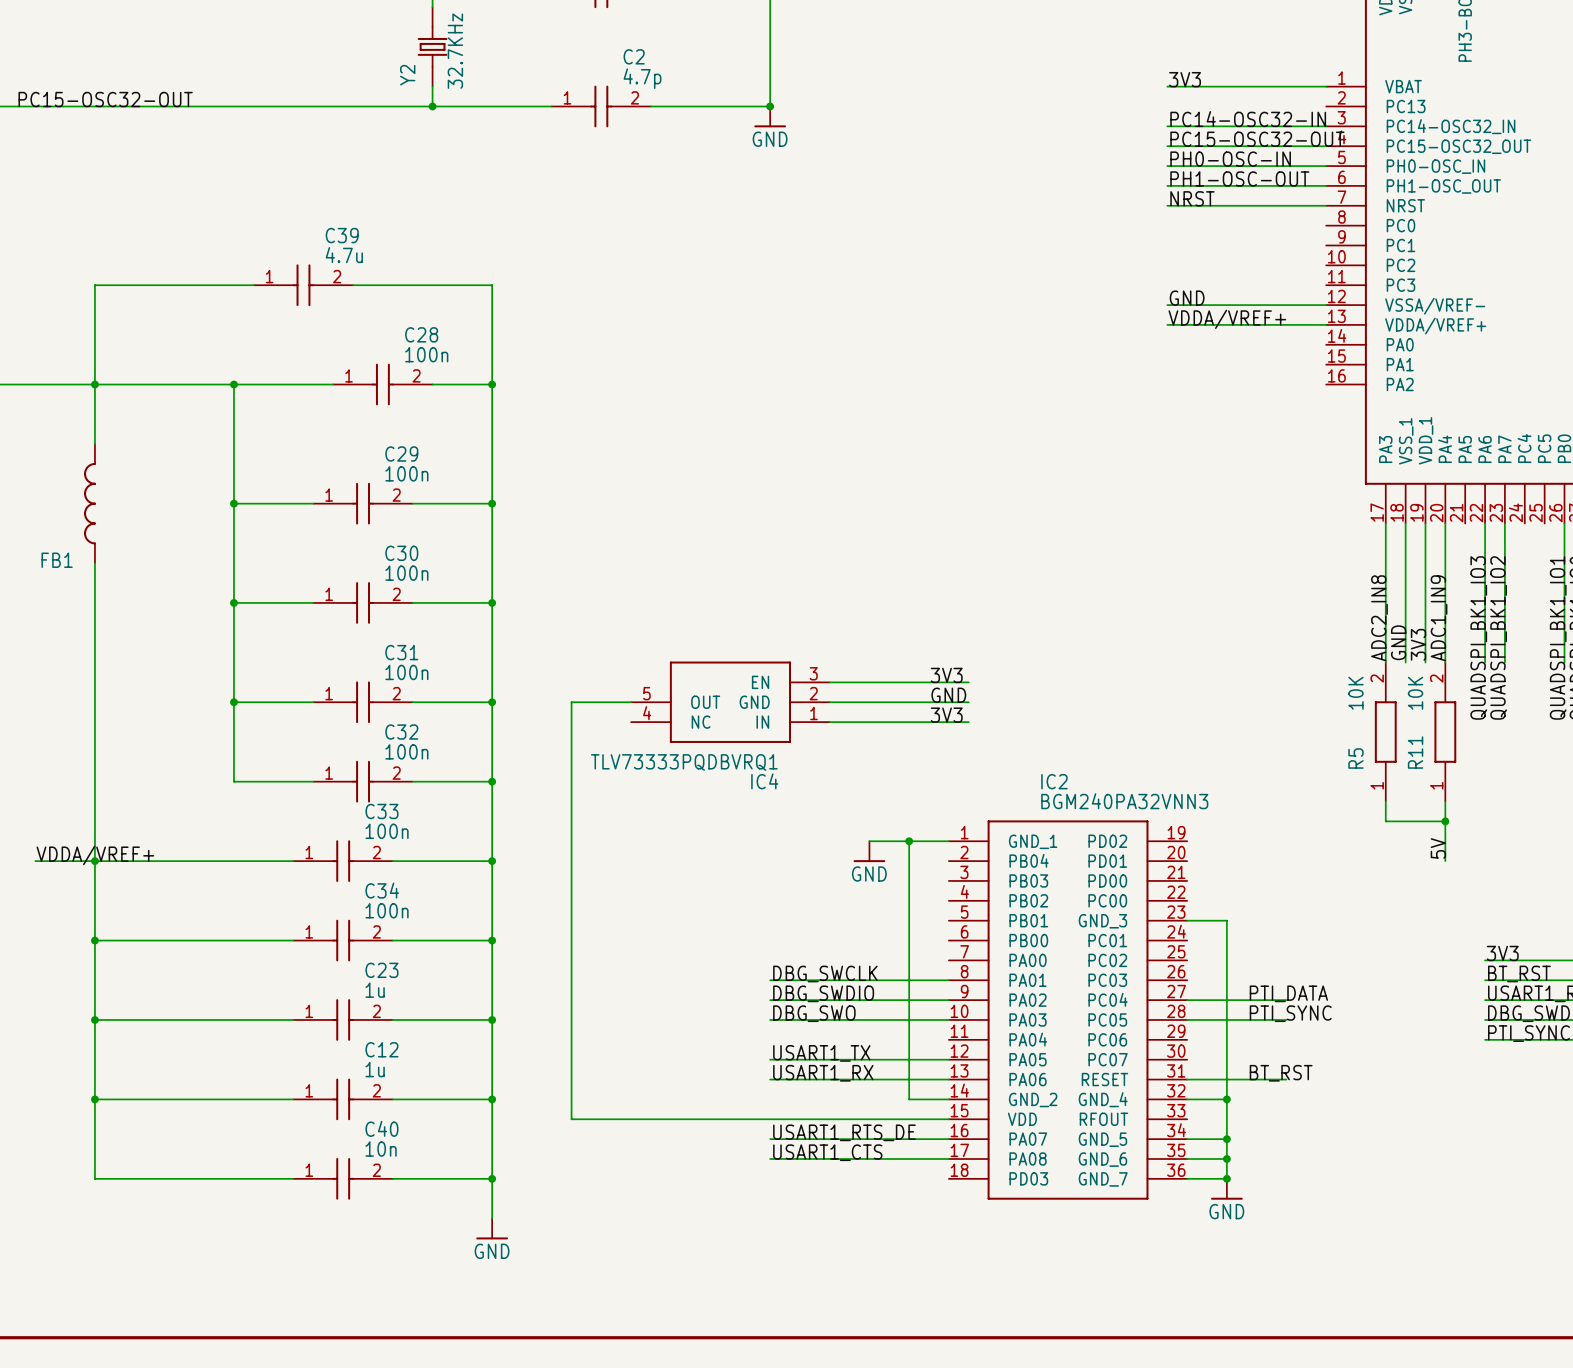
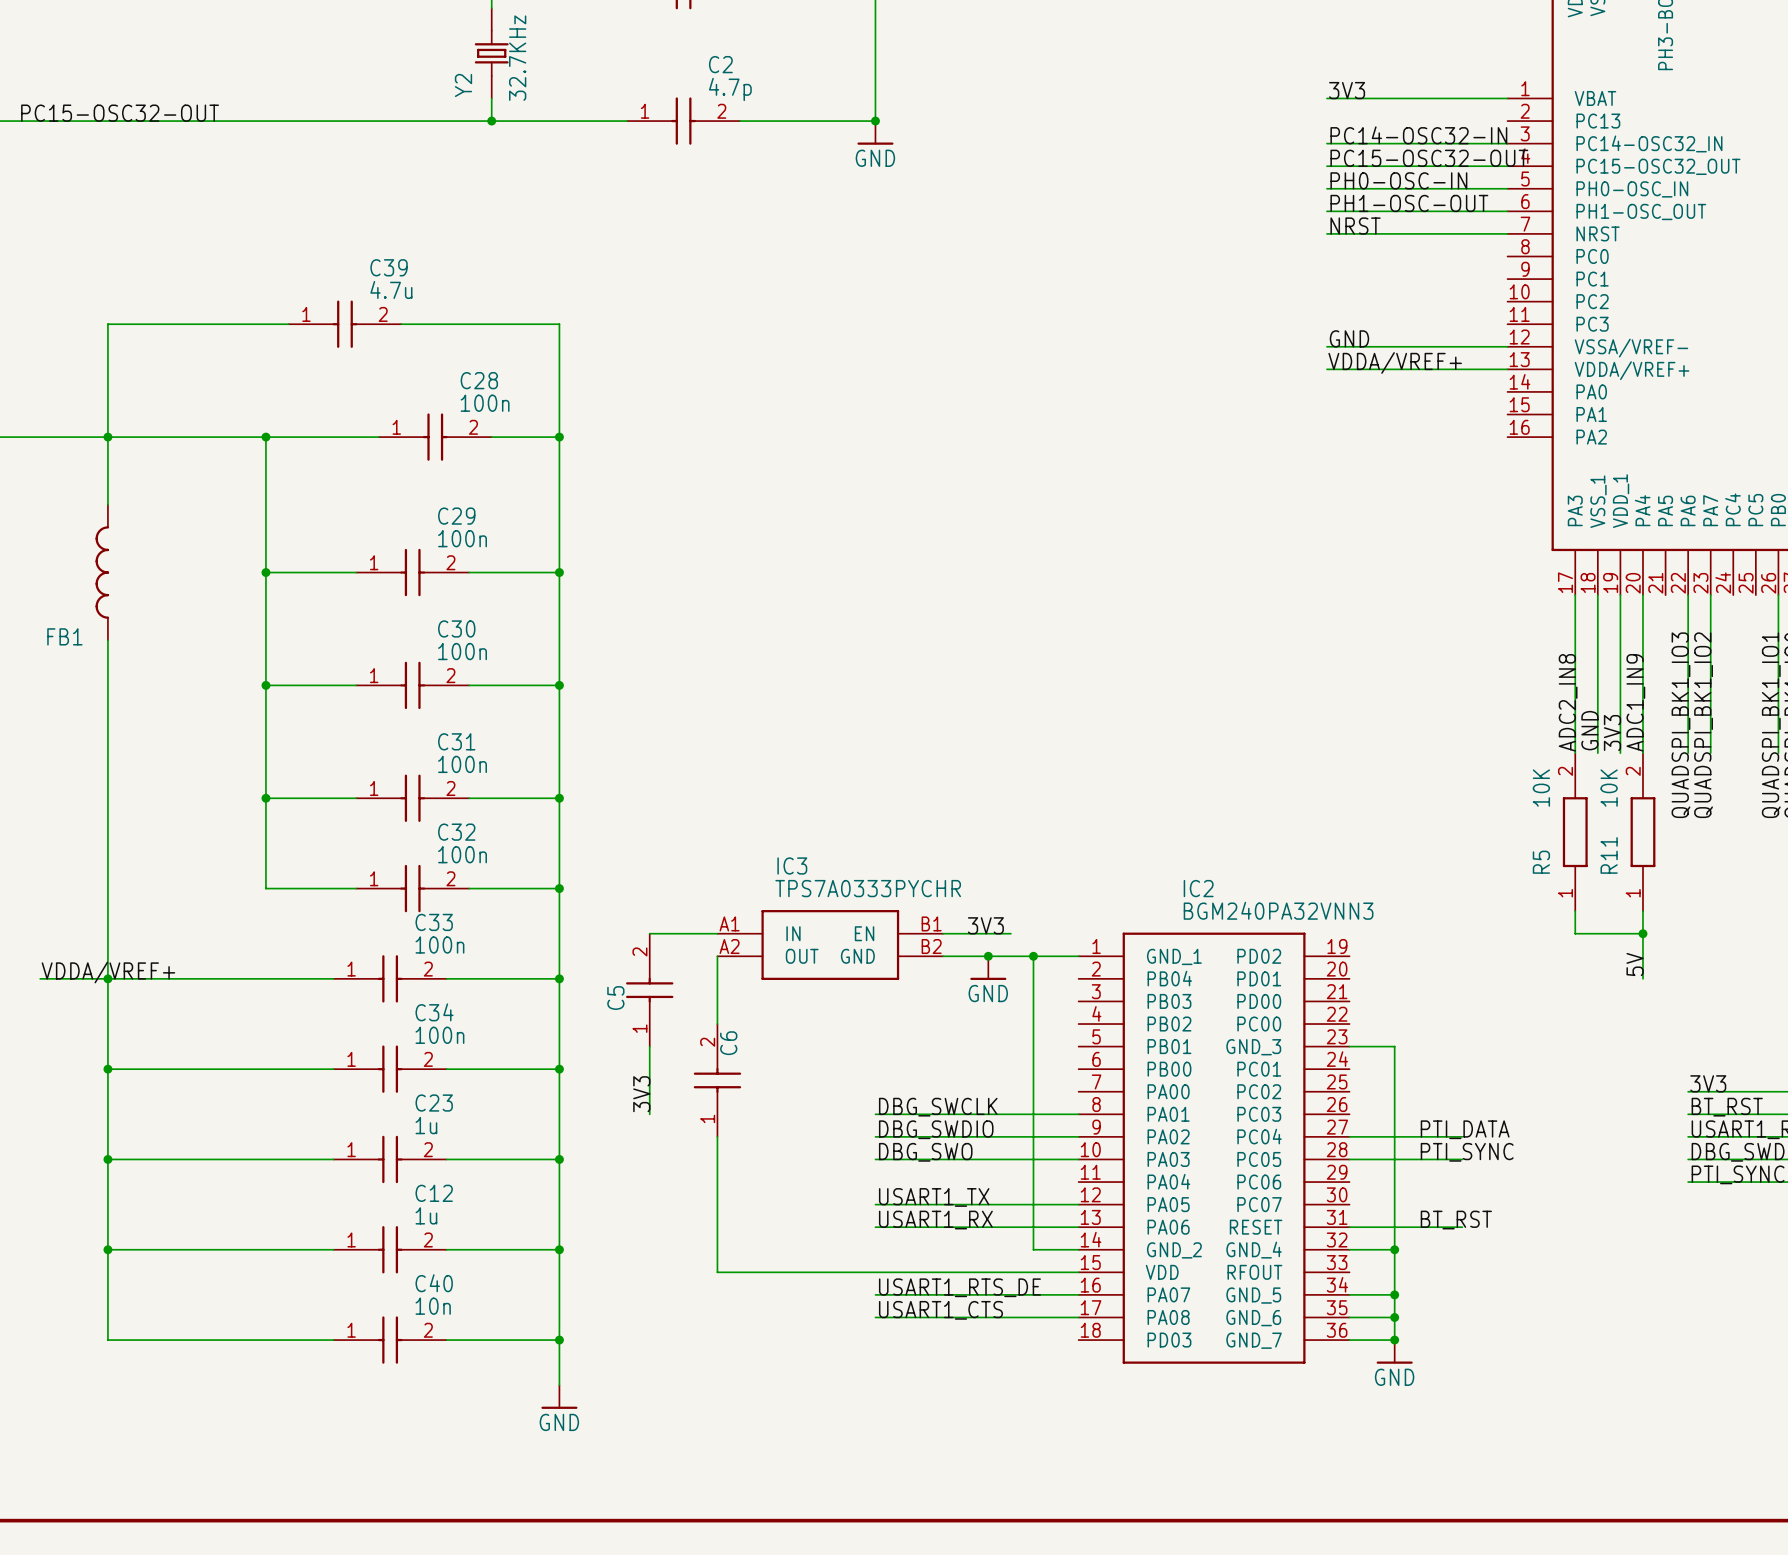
label: 3V3 (946, 675) -> none
wire: (829, 682) (968, 682) -> none
label: GND (948, 695) -> none
wire: (631, 702) (571, 702) (571, 920) -> none
IC4: TLV73333PQDBVRQ1 (730, 702) -> none
wire: (829, 702) (968, 702) -> none
label: 3V3 (946, 715) -> none
wire: (829, 722) (968, 722) -> none
label: none -> 3V3 (985, 925)
wire: none -> (649, 933) (717, 933)
wire: none -> (943, 933) (1010, 933)
IC3: none -> TPS7A0333PYCHR (830, 945)
wire: none -> (717, 956) (717, 1024)
wire: none -> (943, 956) (988, 956)
junction: none -> (988, 956)
C5: none -> (649, 990)
C6: none -> (717, 1080)
label: none -> 3V3 (641, 1094)
wire: (571, 980) (571, 1119) (631, 1119) -> (717, 1136) (717, 1272)

